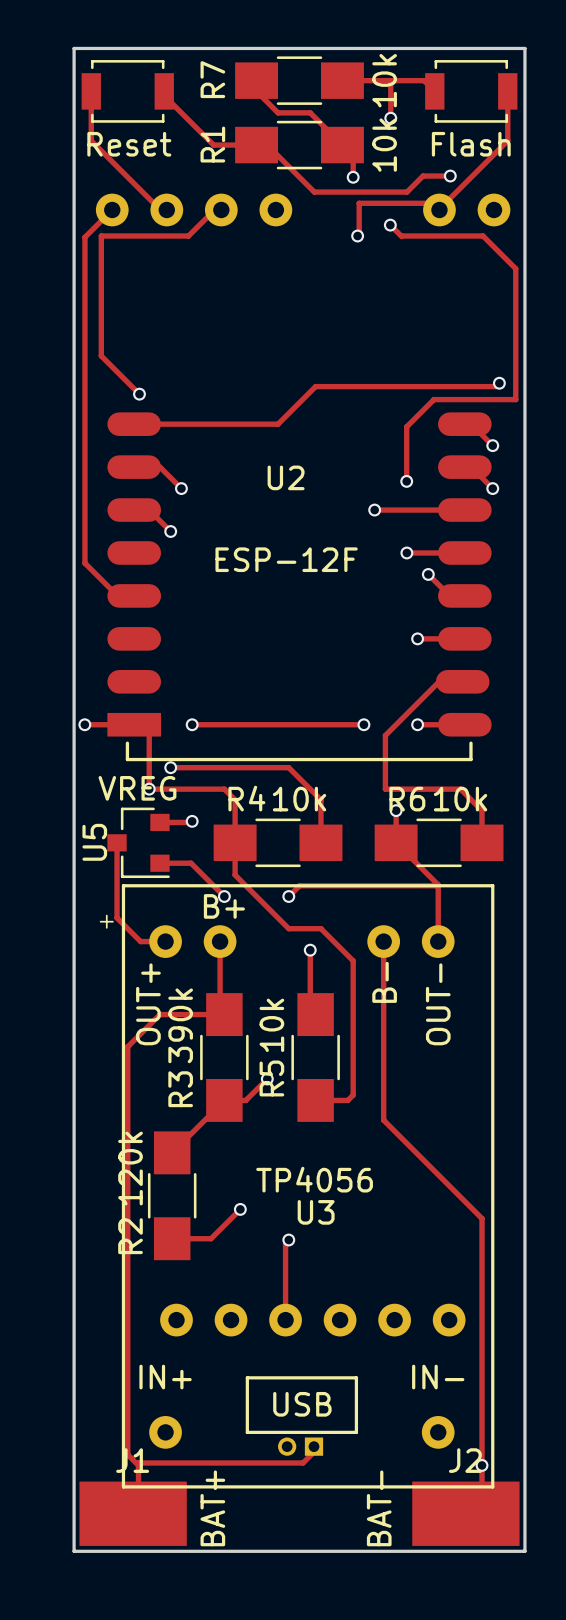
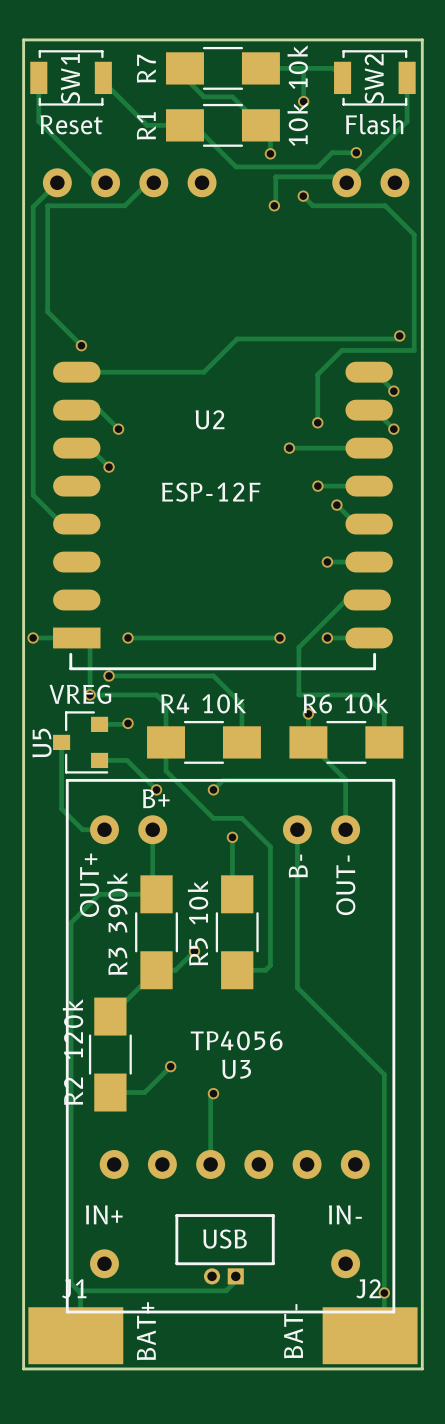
SW1 name: none -> SW1 (70, 78)
SW2 name: none -> SW2 (374, 78)
text: + (106, 921) -> none

